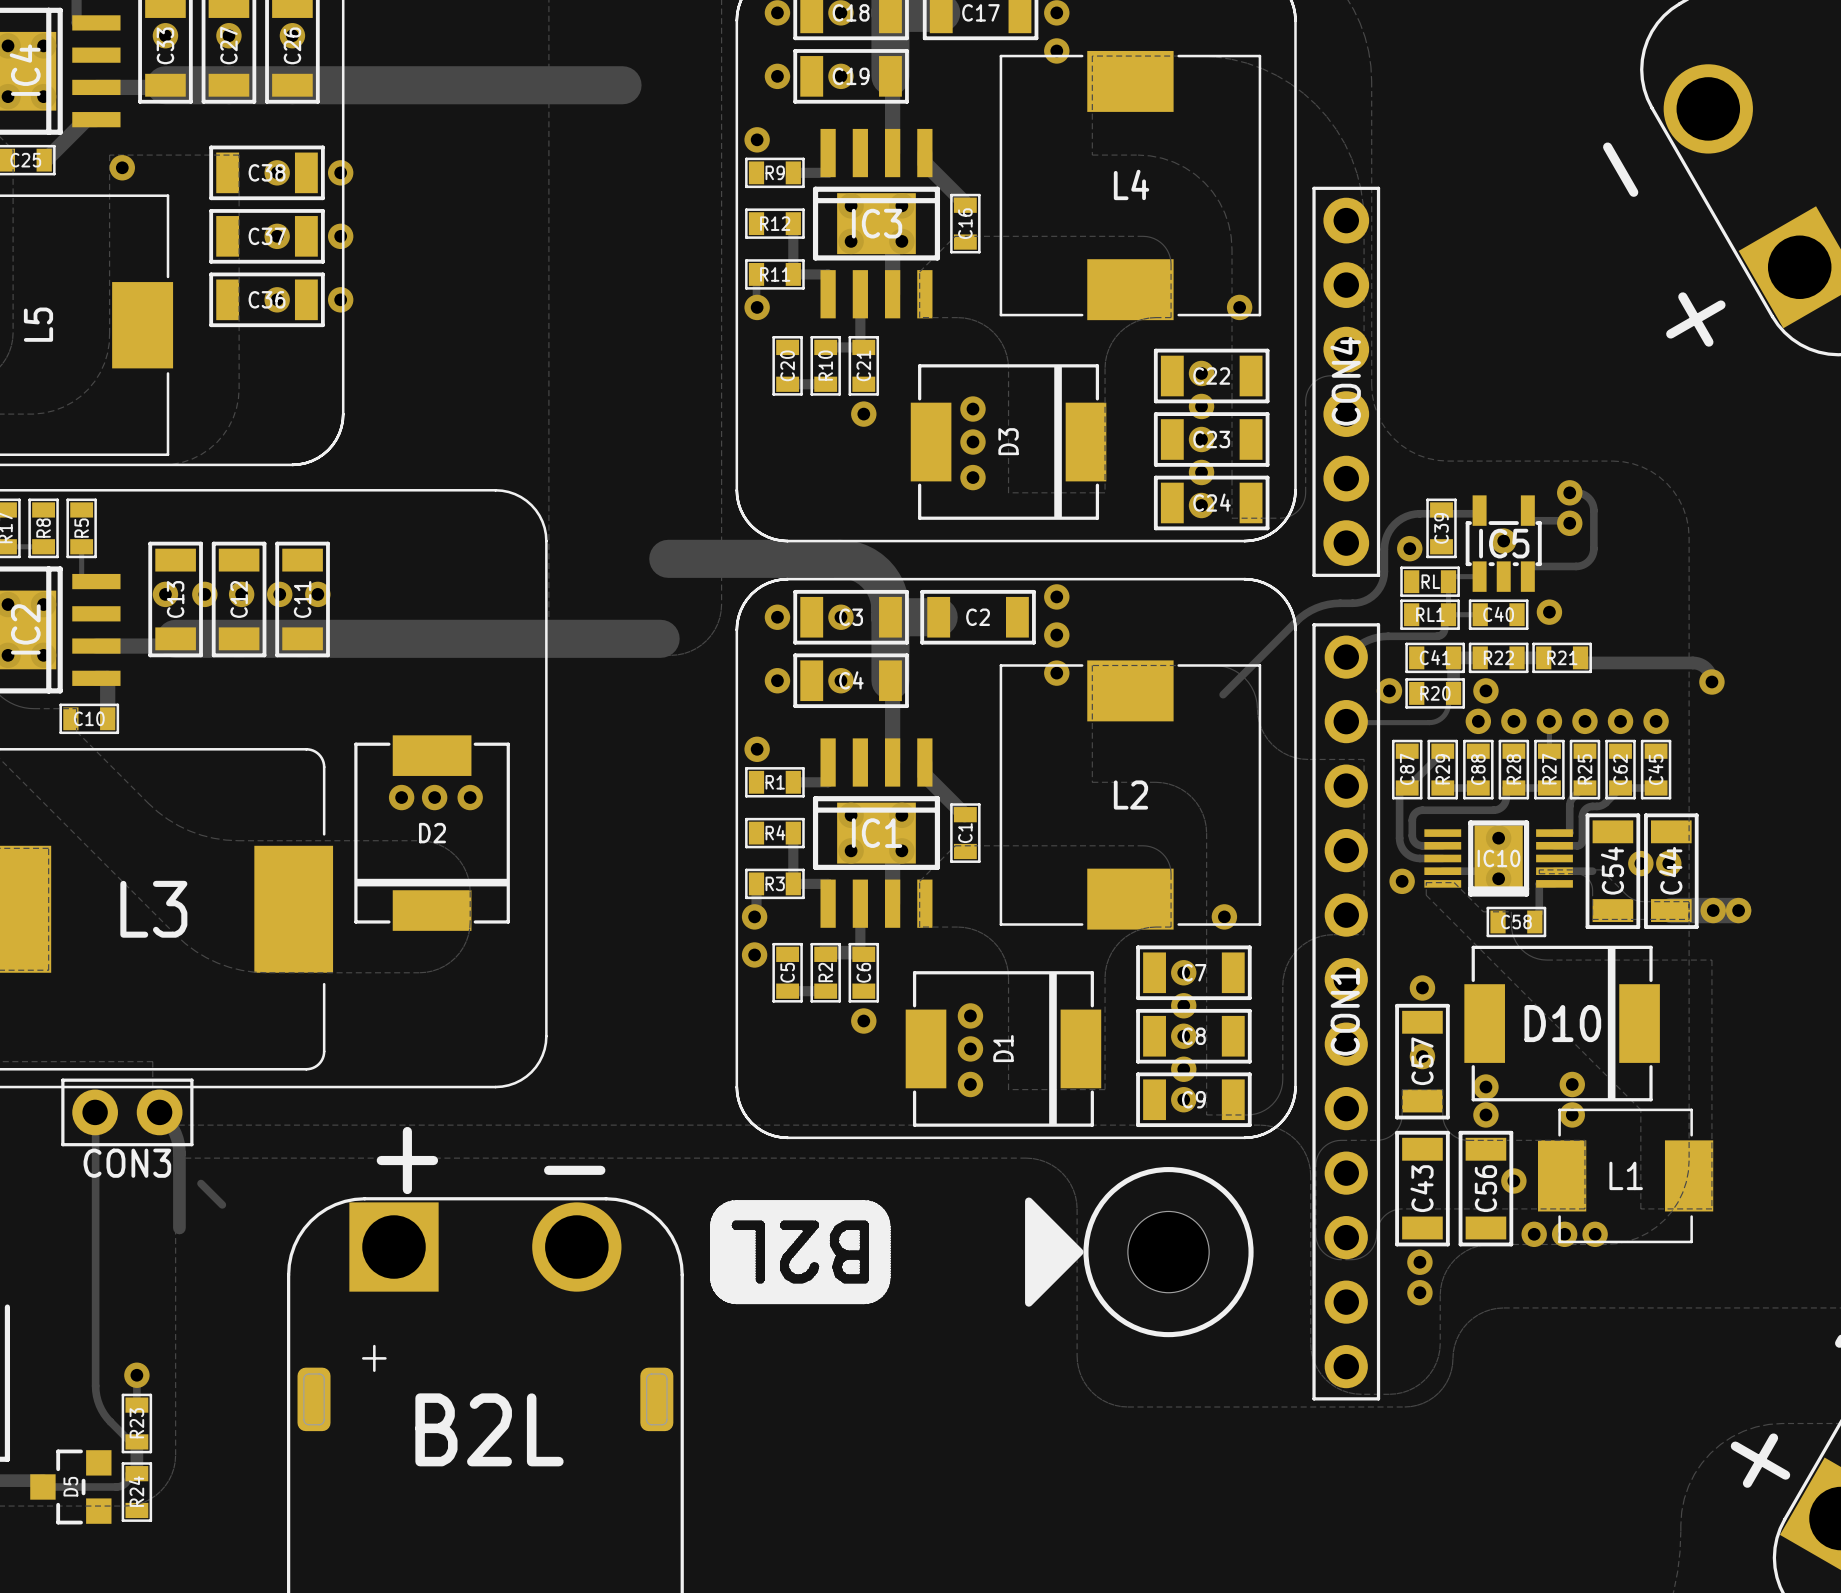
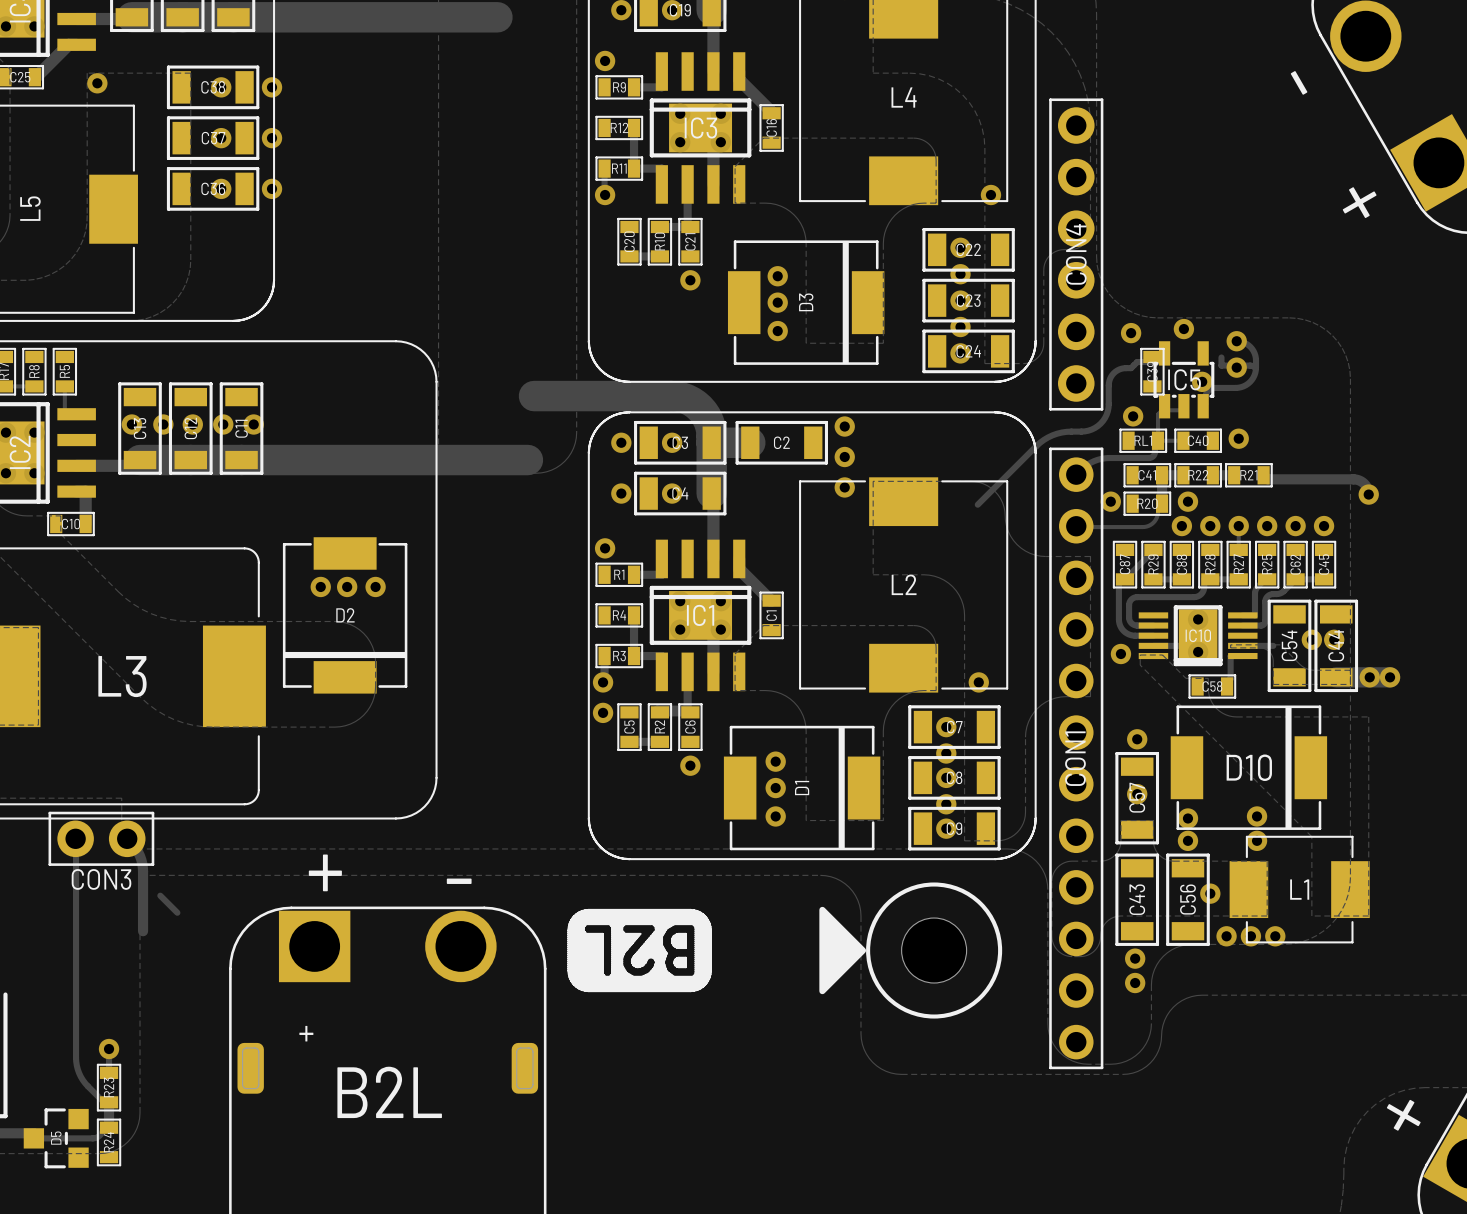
via: none -> (1183, 329)
via: none -> (1131, 333)
track: none -> (1236, 341) (1246, 343) (1254, 353) (1256, 367) (1253, 377) (1248, 383) (1240, 387) (1210, 389) (1206, 394) (1205, 404) (1203, 406)
track: (1569, 492) (1584, 495) (1593, 505) (1593, 548) (1591, 557) (1584, 564) (1578, 566) (1527, 566) (1527, 576) -> none
via position: (1569, 492) -> (1236, 341)
track: (1479, 510) (1479, 513) (1445, 513) (1441, 509) (1441, 513) (1415, 514) (1398, 521) (1391, 527) (1385, 540) (1384, 575) (1380, 587) (1368, 599) (1352, 603) -> (1164, 353) (1164, 362) (1137, 362) (1131, 368) (1121, 368) (1113, 373) (1108, 383) (1108, 407) (1105, 417) (1095, 427) (1081, 431)
via position: (1569, 523) -> (1236, 367)
IC5 position: (1503, 543) -> (1183, 379)
via: (1409, 548) -> none
RL: (1430, 581) -> none
via: none -> (1133, 416)

